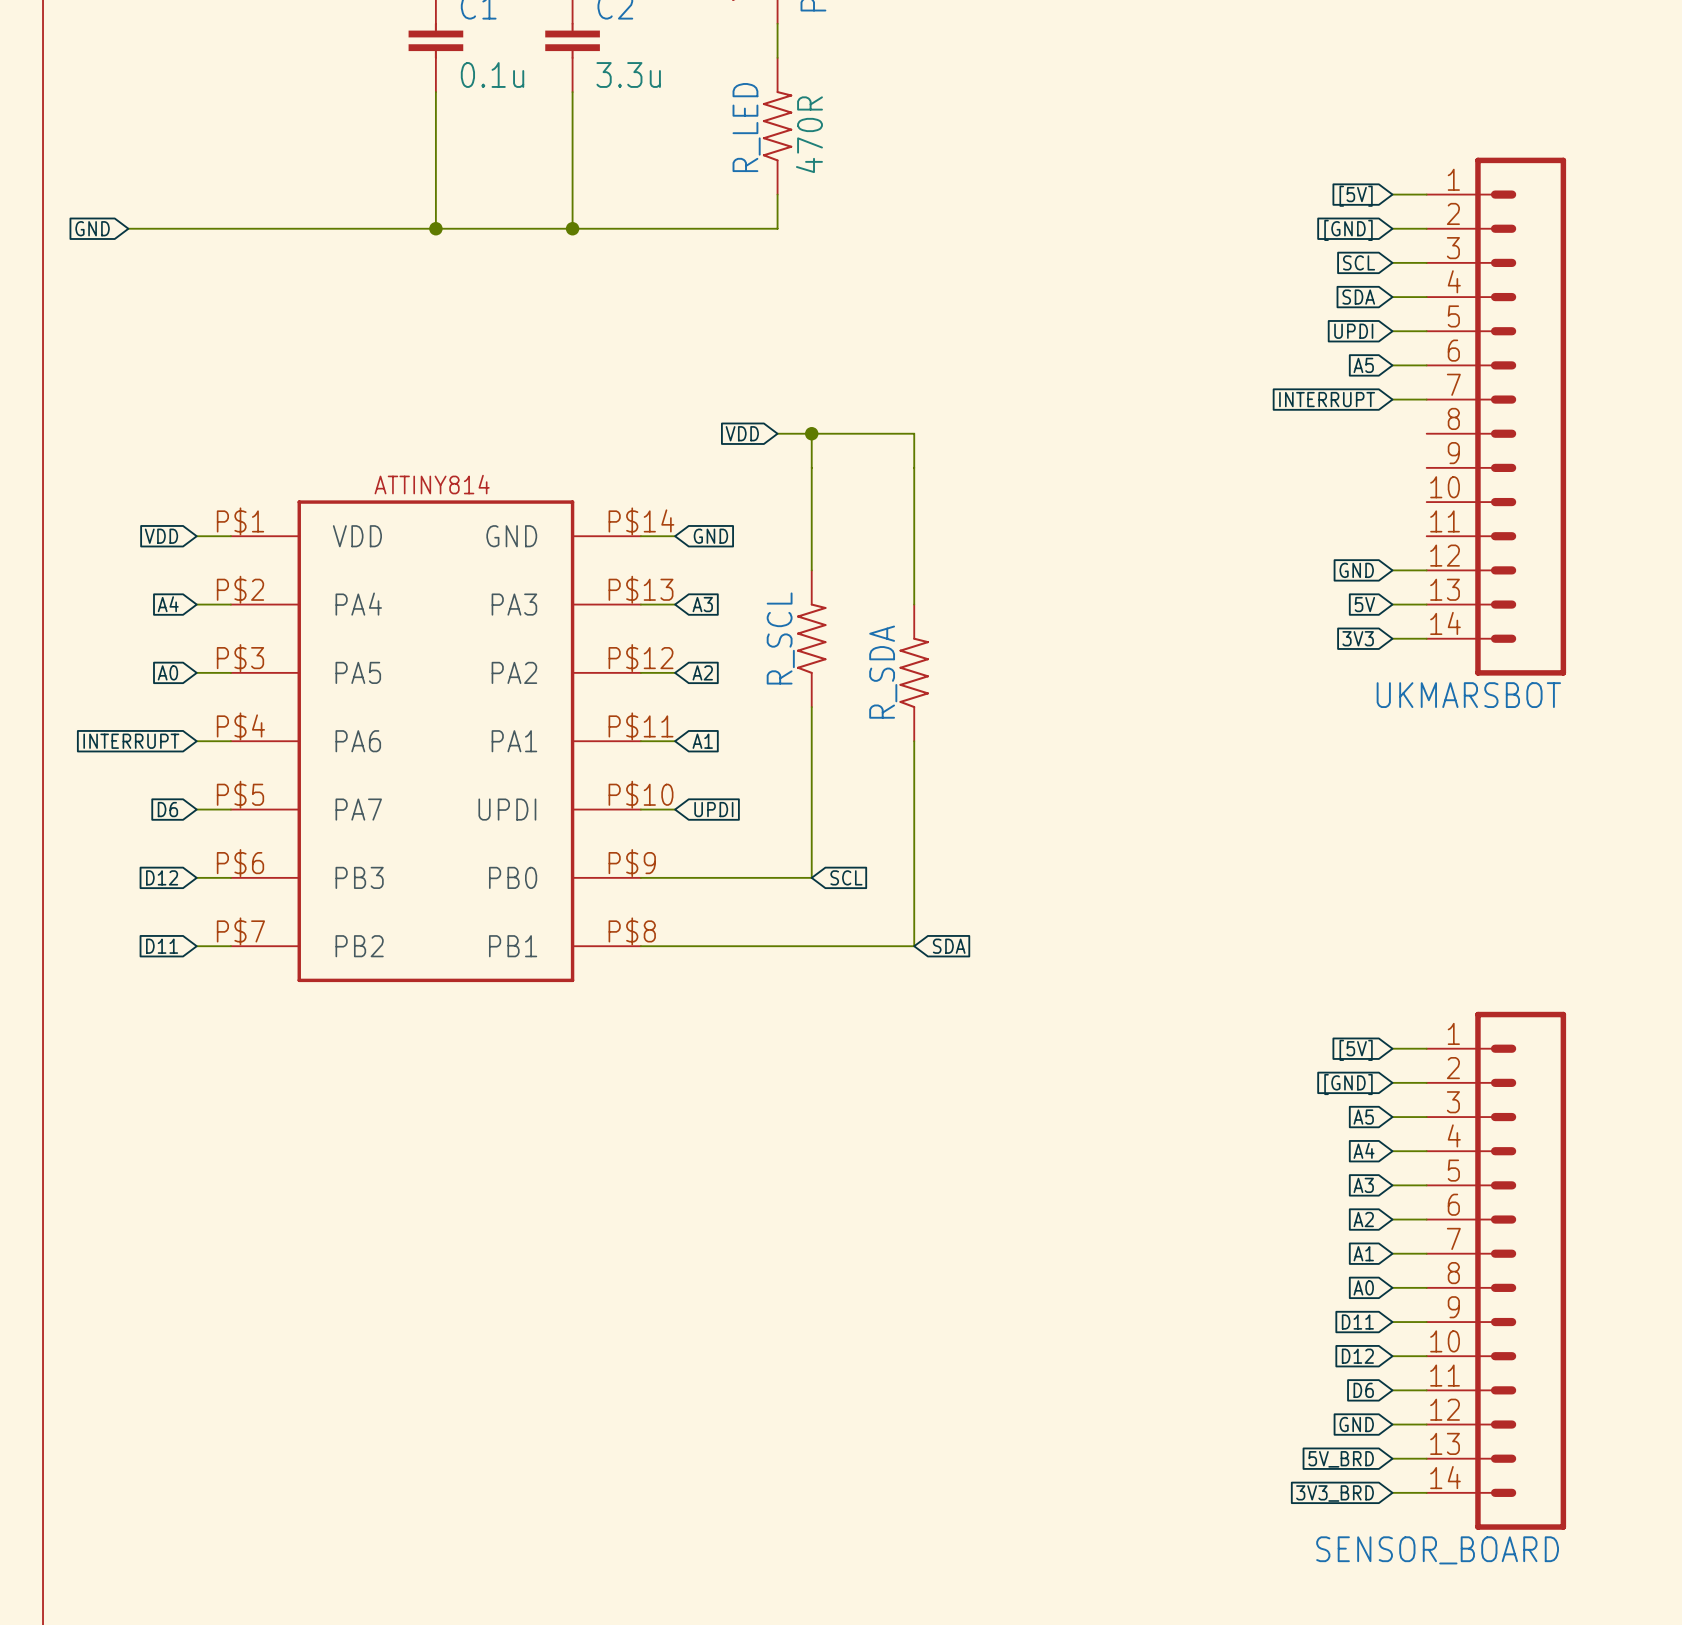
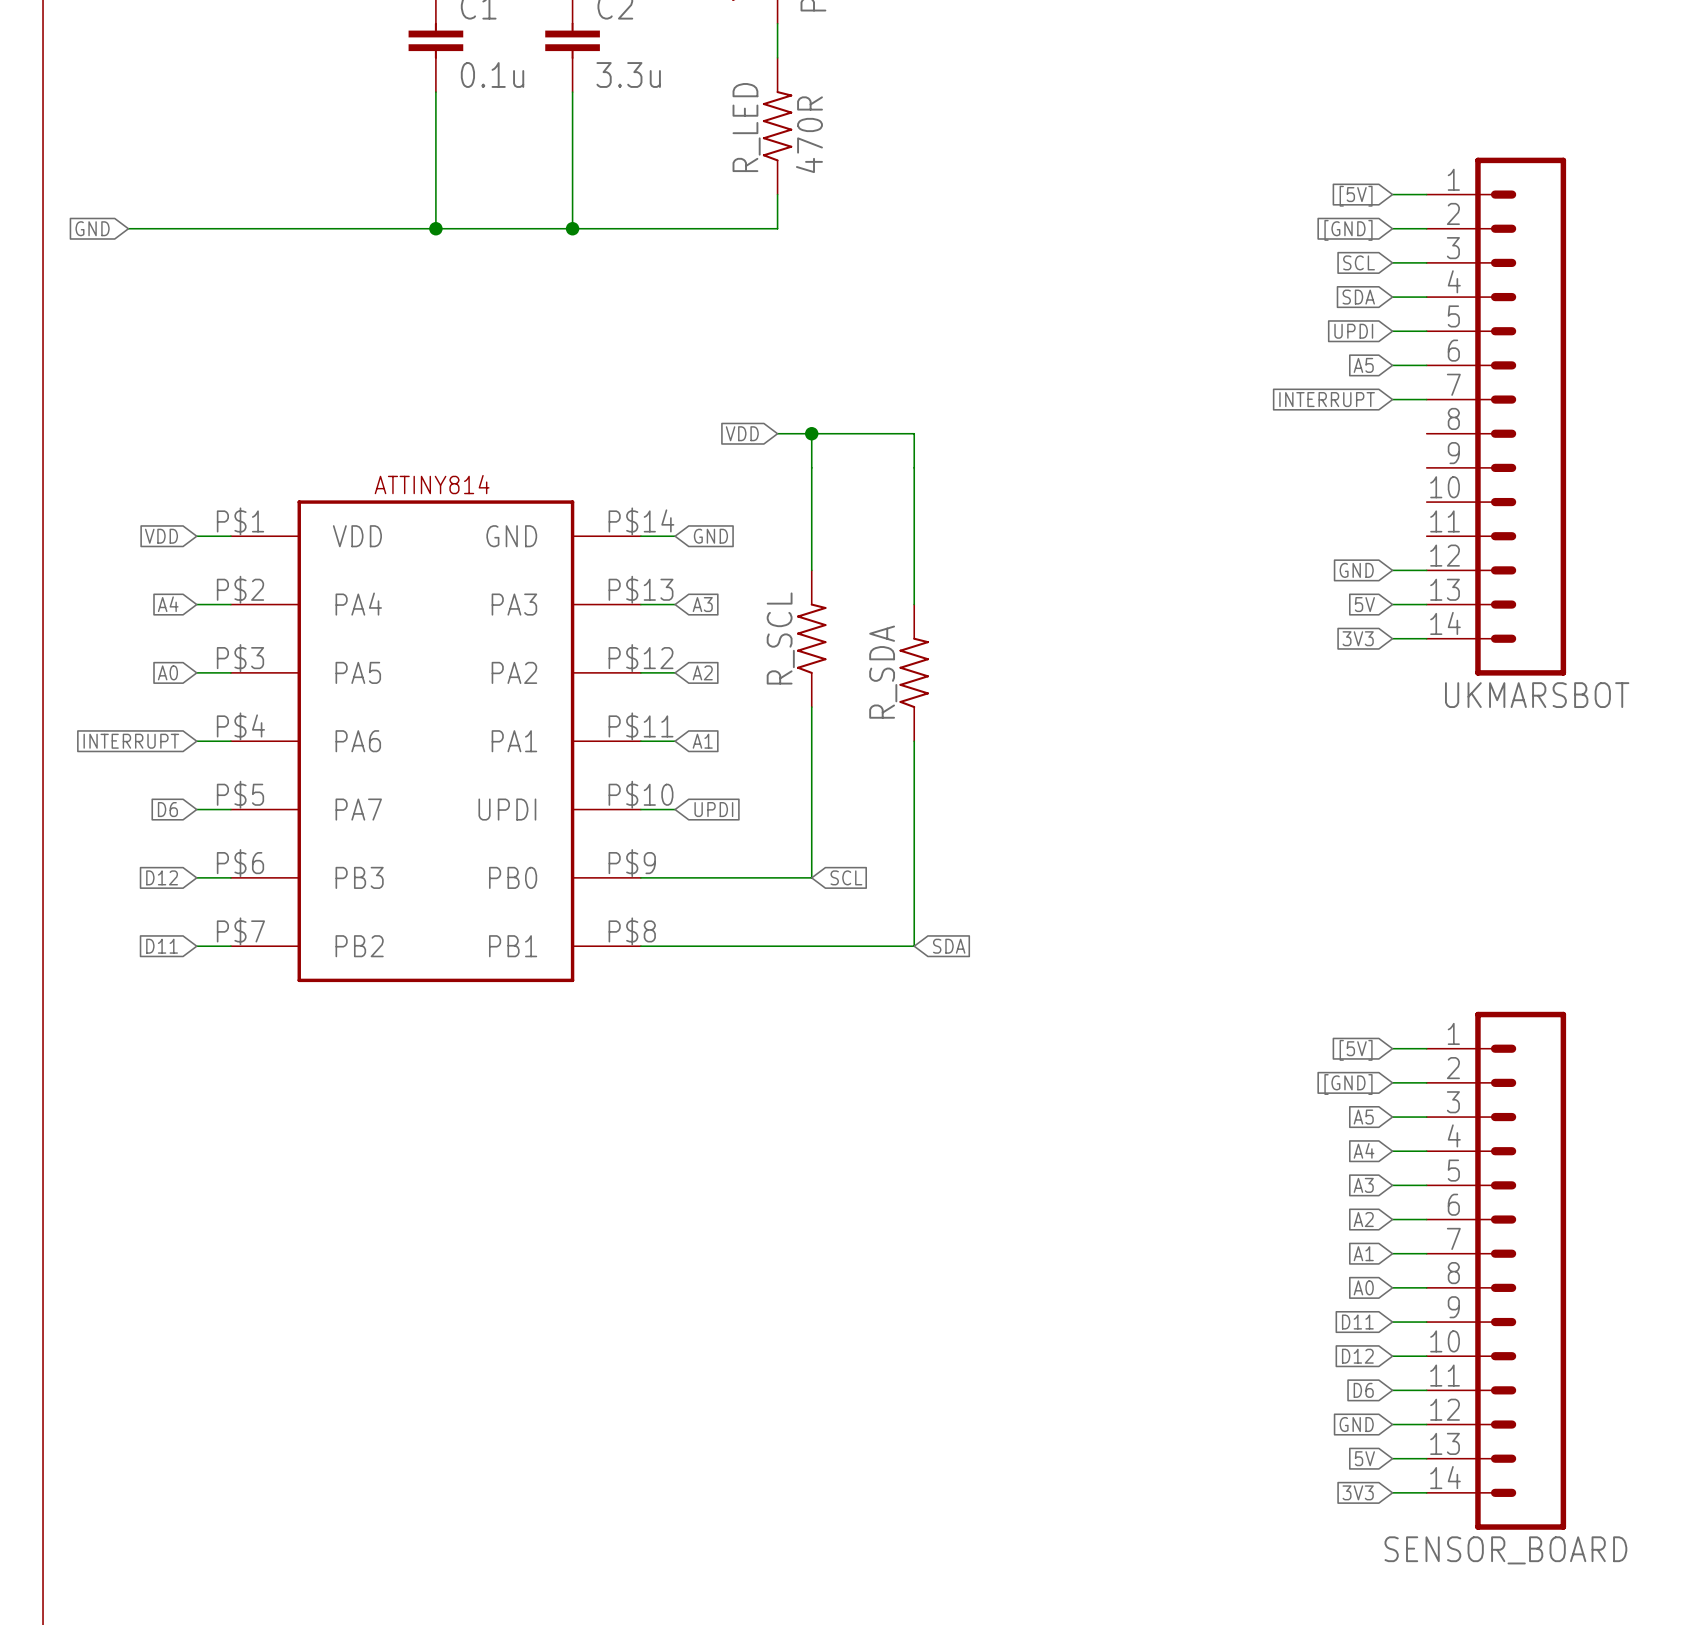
UKMARSBOT name position: UKMARSBOT (1468, 695) -> UKMARSBOT (1537, 695)
global label: 5V_BRD (1341, 1459) -> 5V (1364, 1458)
global label: 3V3_BRD (1335, 1493) -> 3V3 (1358, 1492)
SENSOR_BOARD name position: SENSOR_BOARD (1437, 1550) -> SENSOR_BOARD (1505, 1550)

